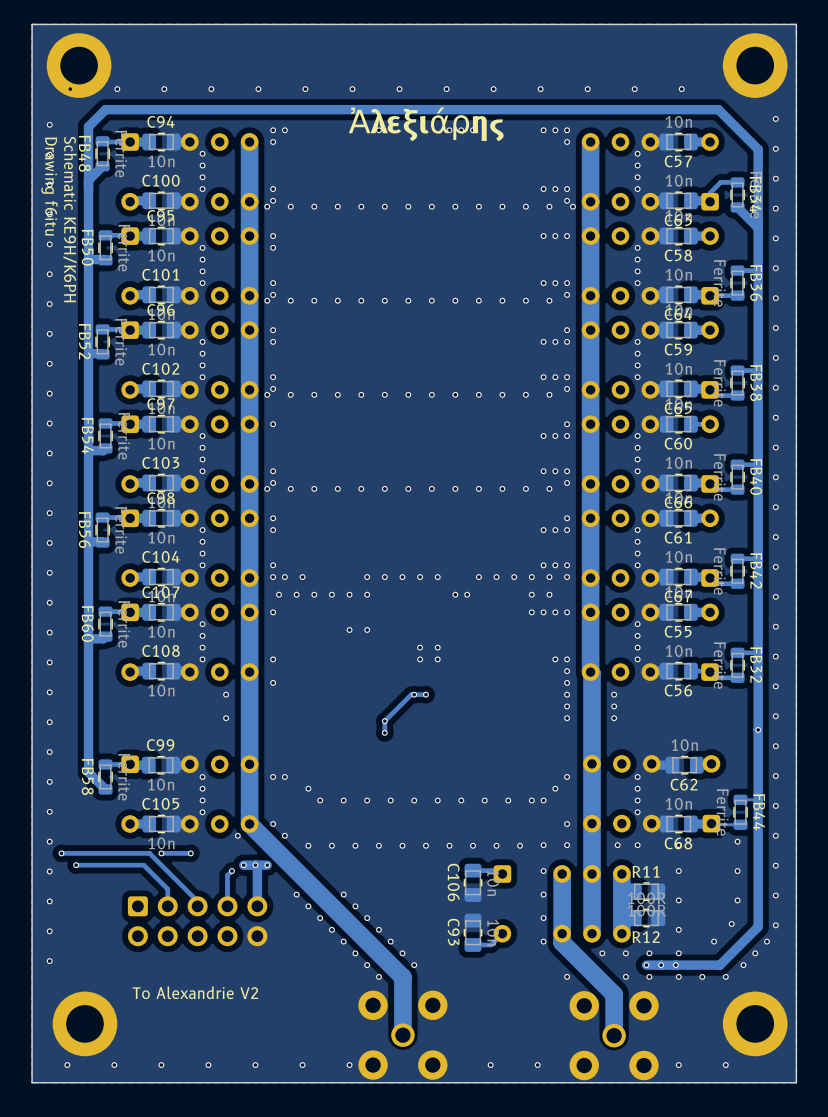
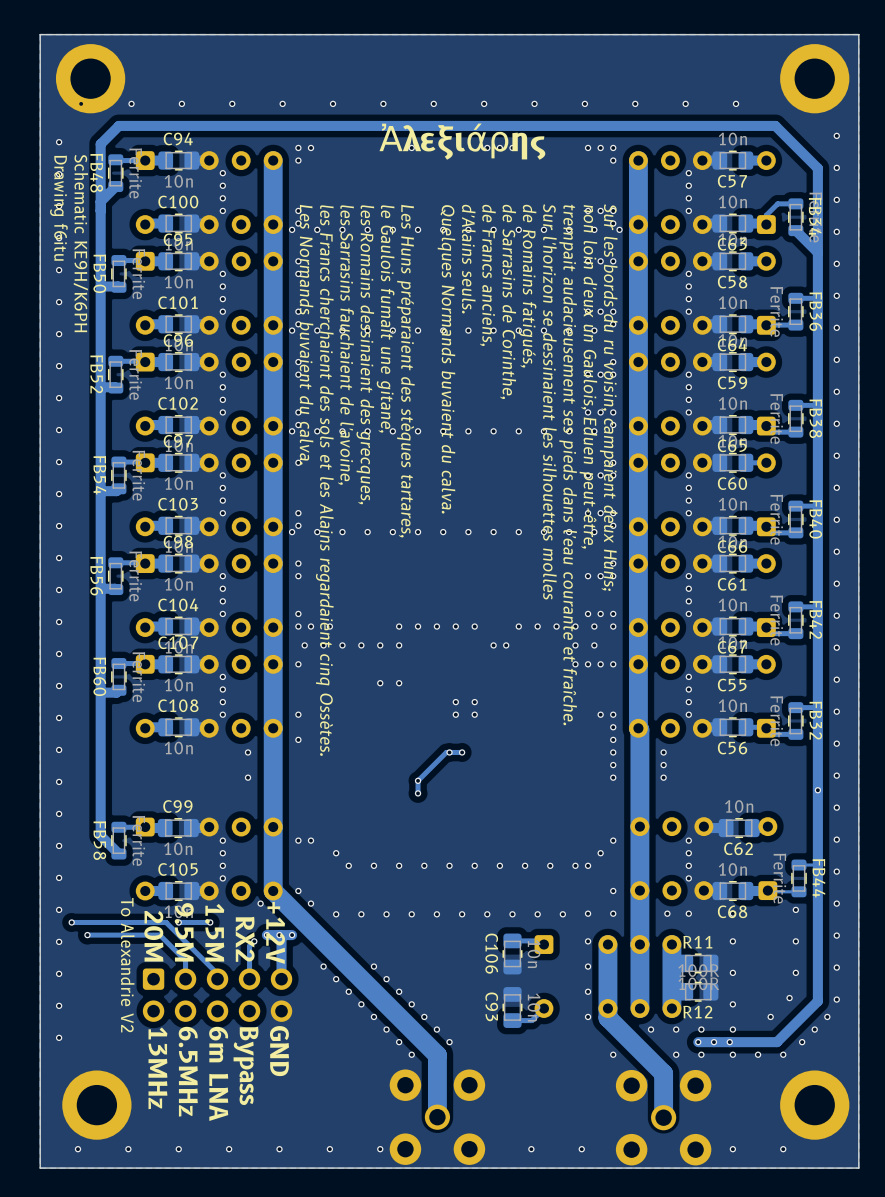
text: none -> d'Alains seuls. (468, 259)
text: none -> de Francs anciens, (487, 275)
text: none -> de Romains fatigués, (527, 286)
text: none -> de Sarrasins de Corinthe, (508, 301)
text: none -> le Gaulois fumait une gitane, (385, 318)
text: none -> Les Normands buvaient du calva. (306, 334)
text: none -> les Sarrasins fauchaient de l'avoine, (345, 345)
text: none -> les Romains dessinaient des grecques, (365, 354)
text: none -> Quelques Normands buvaient du calva. (446, 359)
text: none -> Les Huns préparaient des stèques tartares, (405, 371)
text: none -> non loin d'eux un Gaulois, Eduen peut-être, (588, 376)
text: none -> Sur les bords du ru voisin, campaient deux Huns; (608, 397)
text: none -> Sur l'horizon se dessinaient les silhouettes molles (549, 401)
text: none -> trempait audacieusement ses pieds dans l'eau courante et fraîche. (568, 465)
text: none -> les Francs cherchaient des sols et les Alains regardaient cinq Ossètes. (324, 480)
text: none -> 9.5M (184, 932)
text: none -> 1.5M (214, 932)
text: none -> +12V (275, 932)
text: none -> 20M (153, 936)
text: none -> RX2 (245, 939)
text: none -> GND (279, 1051)
text: none -> Bypass (245, 1065)
text: none -> 13MHz (157, 1068)
text: none -> 6.5MHz (188, 1071)
text rotation: 0° (195, 992) -> 90° clockwise (127, 965)
text: none -> 6m LNA (218, 1073)

